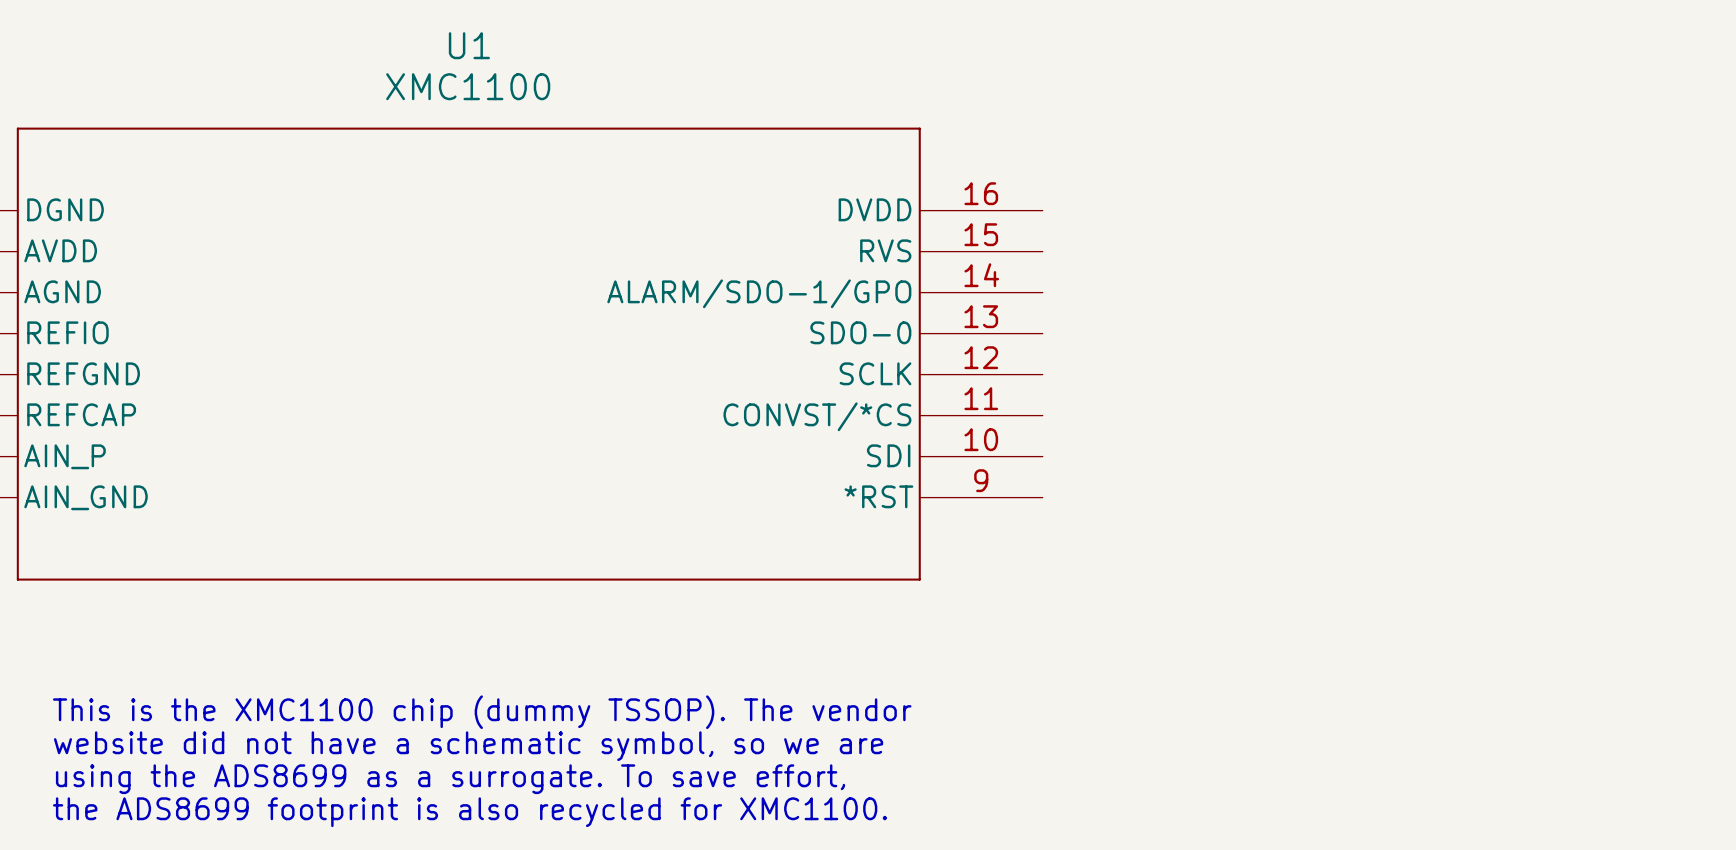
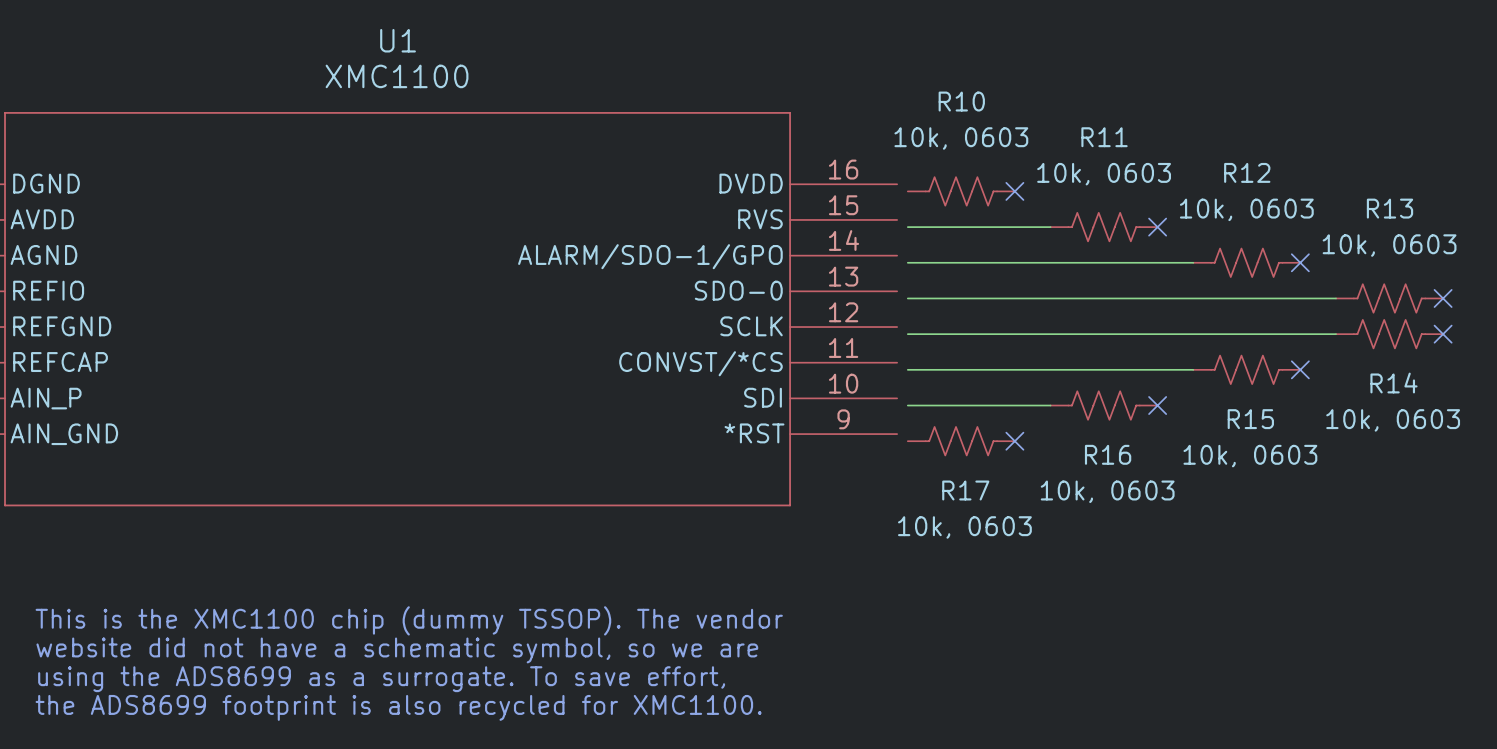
R10: none -> 10k, 0603 (961, 191)
no-connect mark: none -> (1014, 191)
wire: none -> (907, 227) (1050, 227)
R11: none -> 10k, 0603 (1104, 227)
no-connect mark: none -> (1157, 227)
wire: none -> (907, 262) (1193, 262)
R12: none -> 10k, 0603 (1246, 262)
no-connect mark: none -> (1300, 262)
wire: none -> (907, 298) (1336, 298)
R13: none -> 10k, 0603 (1389, 298)
no-connect mark: none -> (1443, 298)
wire: none -> (907, 334) (1336, 334)
R14: none -> 10k, 0603 (1389, 334)
no-connect mark: none -> (1443, 334)
wire: none -> (907, 369) (1193, 369)
R15: none -> 10k, 0603 (1246, 369)
no-connect mark: none -> (1300, 369)
wire: none -> (907, 405) (1050, 405)
R16: none -> 10k, 0603 (1104, 405)
no-connect mark: none -> (1157, 405)
R17: none -> 10k, 0603 (961, 441)
no-connect mark: none -> (1014, 441)

